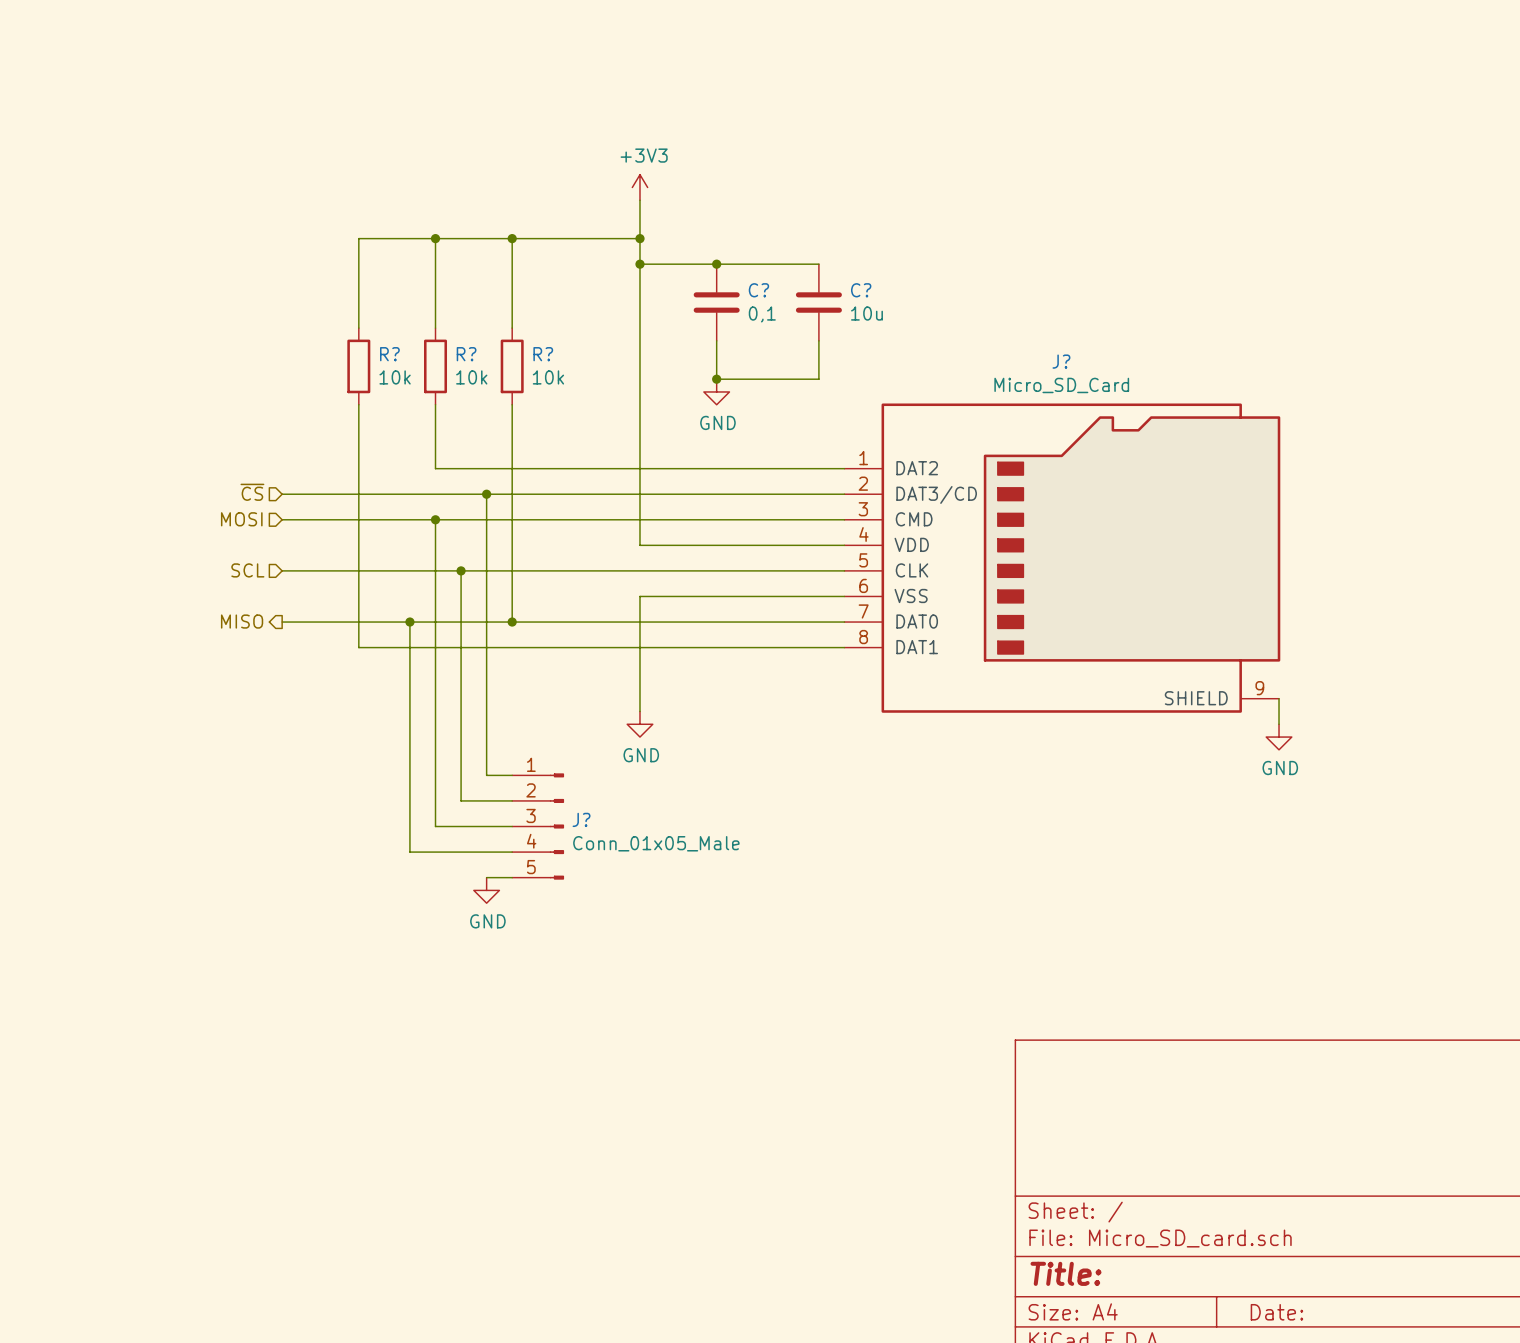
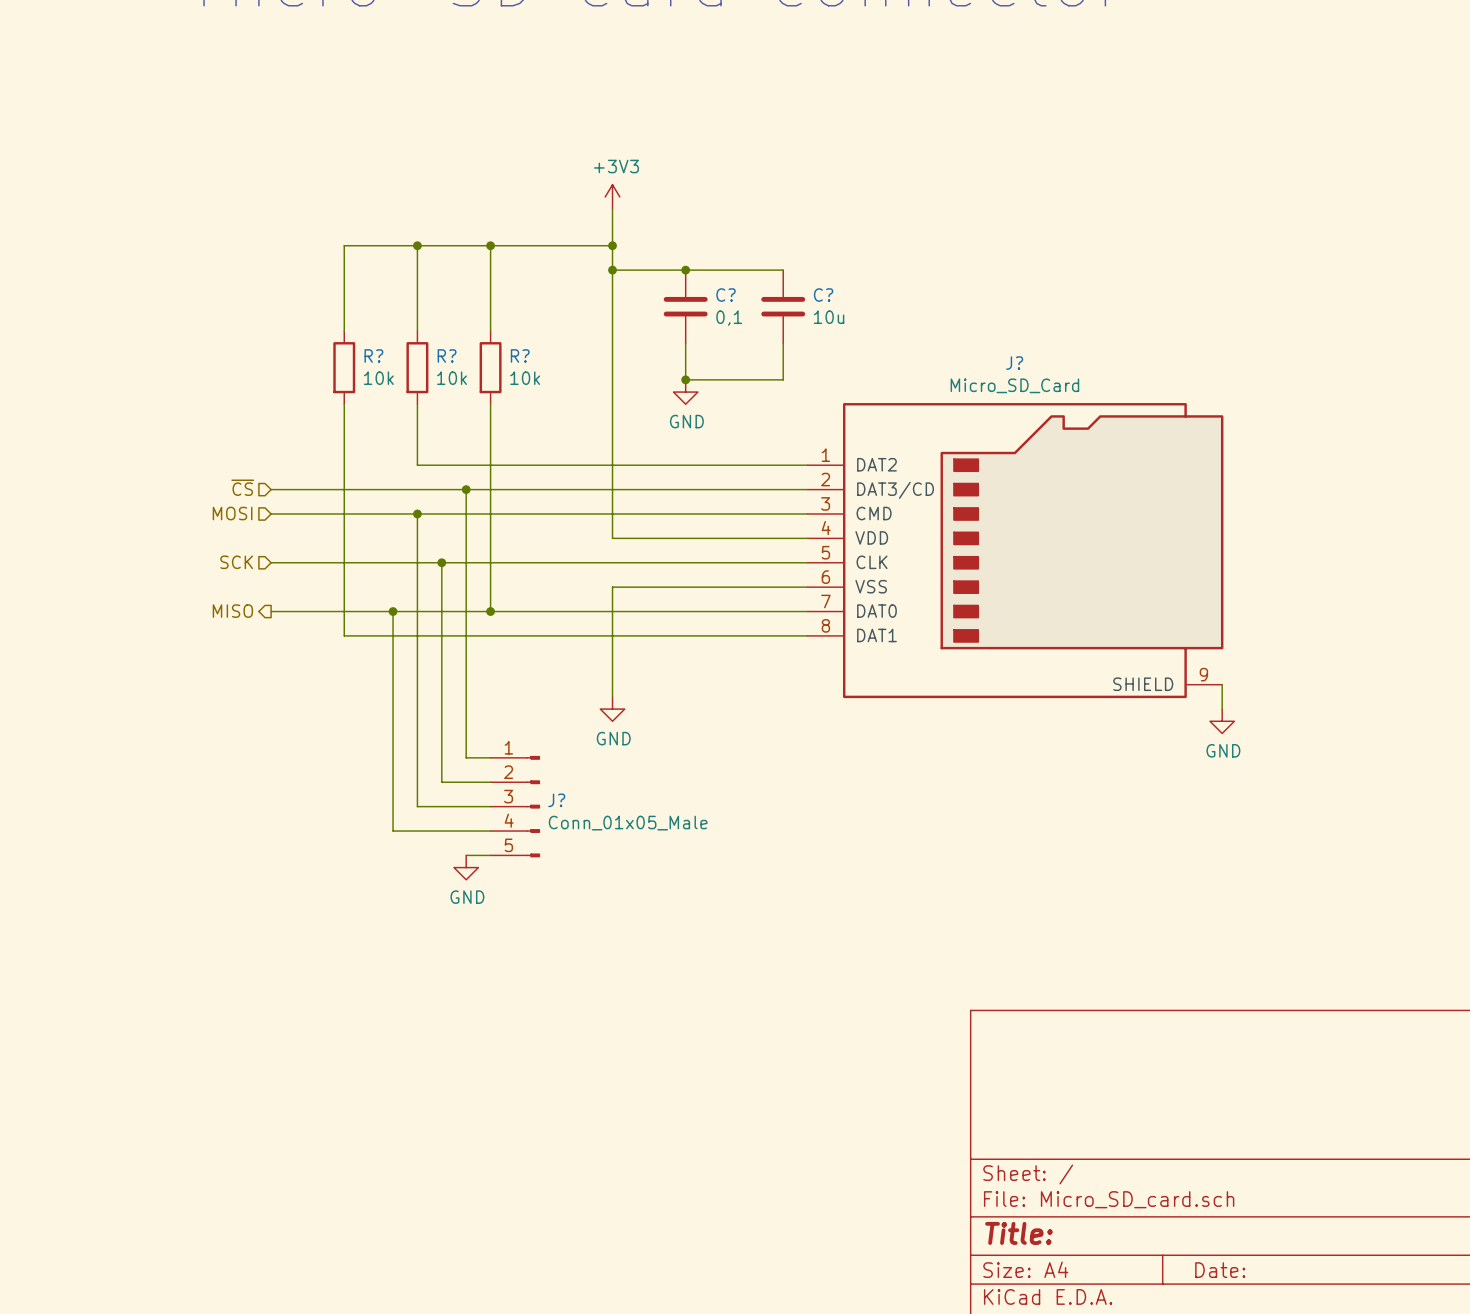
hierarchical label: SCL (247, 570) -> SCK (236, 562)

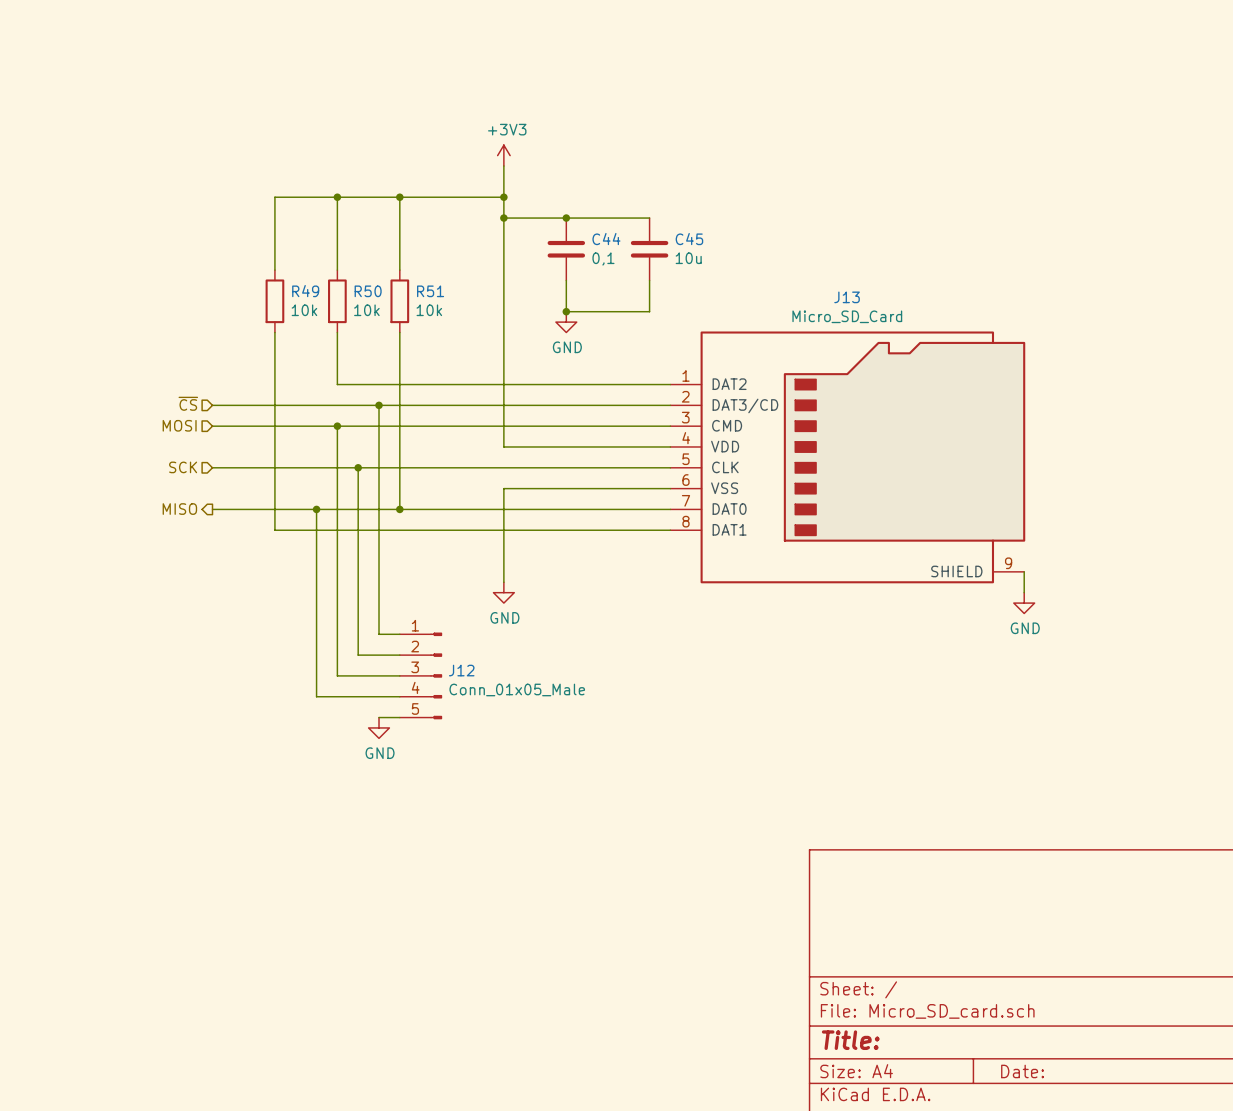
C? name: C? (726, 295) -> C44 (606, 239)
C? name: C? (823, 295) -> C45 (689, 239)
R? name: R? (373, 355) -> R49 (305, 291)
R? name: R? (447, 355) -> R50 (368, 291)
R? name: R? (520, 355) -> R51 (430, 291)
J? name: J? (1014, 363) -> J13 (847, 297)
J? name: J? (556, 800) -> J12 (461, 670)

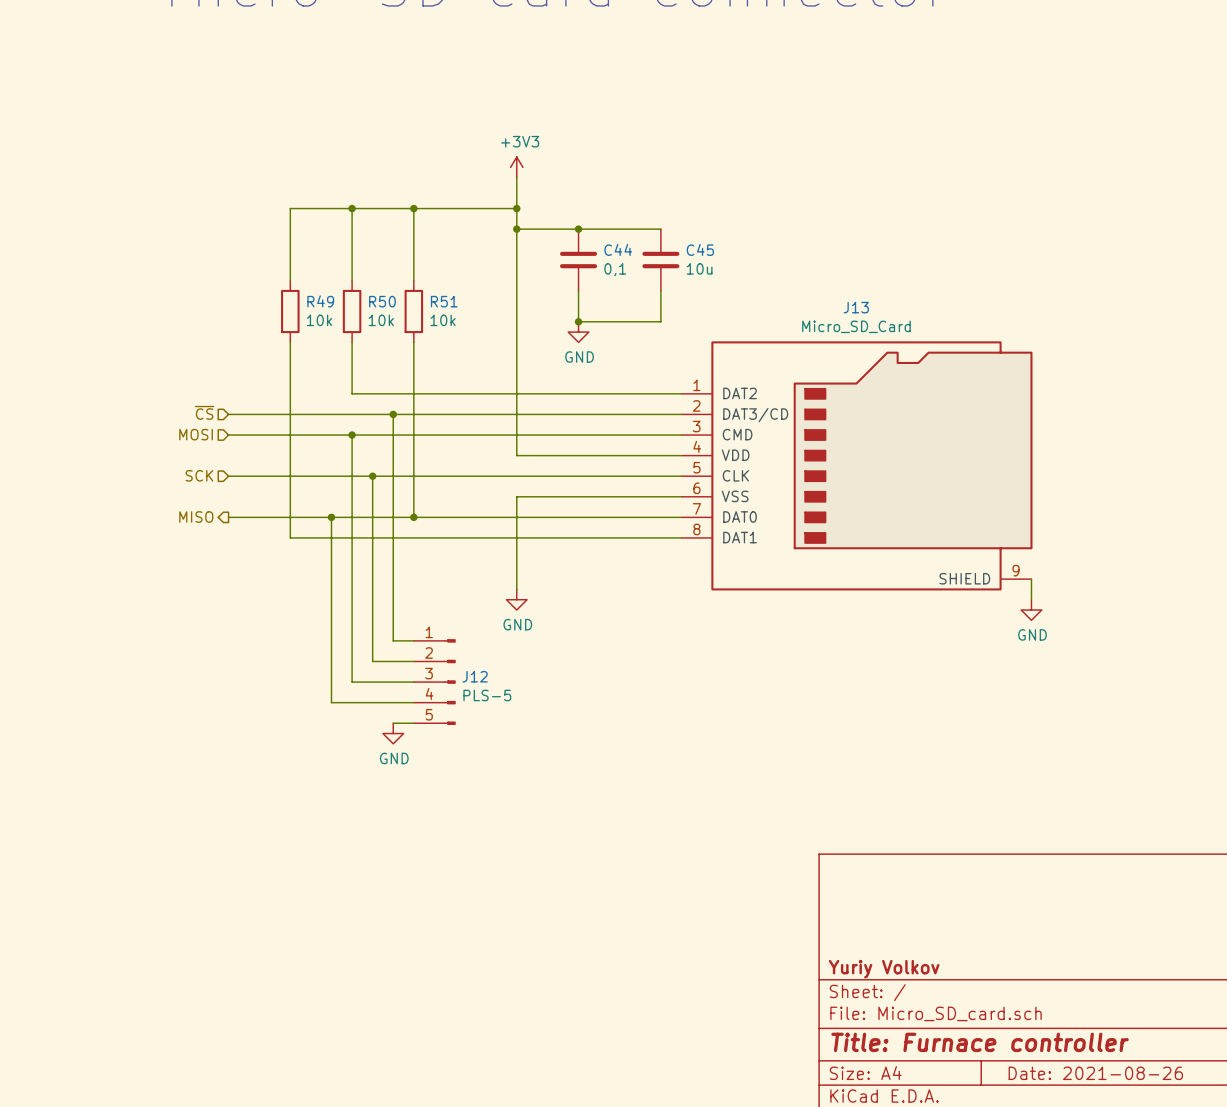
J12 value: Conn_01x05_Male (517, 689) -> PLS-5 (487, 695)
title block: none -> Yuriy Volkov (884, 969)
title block: Title: (850, 1040) -> Title: Furnace controller (980, 1042)
title block: Date: (1022, 1071) -> Date: 2021-08-26 (1095, 1073)

